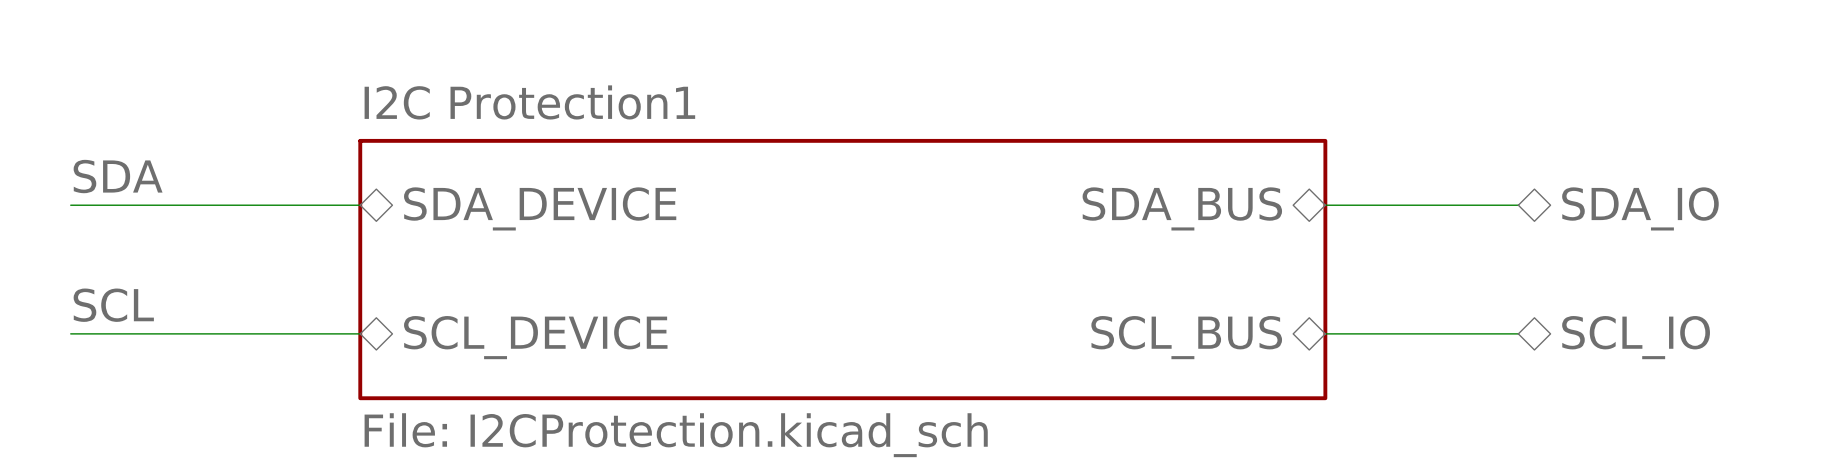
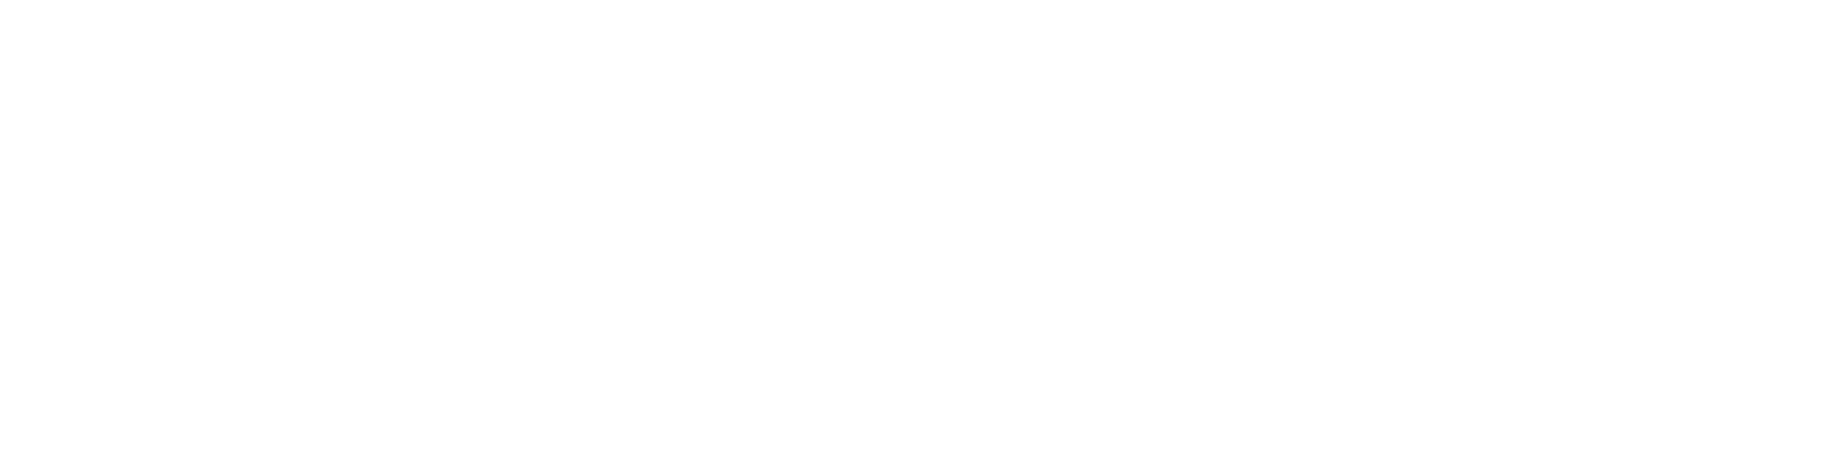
label: SDA (118, 176) -> none
wire: (70, 205) (360, 205) -> none
wire: (1325, 205) (1518, 205) -> none
sheet pin: SDA_DEVICE (540, 208) -> none
sheet pin: SDA_BUS (1182, 208) -> none
hierarchical label: SDA_IO (1640, 208) -> none
sheet I2C Protection1: File: I2CProtection.kicad_sch (842, 269) -> none
label: SCL (113, 305) -> none
wire: (70, 333) (360, 333) -> none
wire: (1325, 333) (1518, 333) -> none
sheet pin: SCL_DEVICE (535, 337) -> none
sheet pin: SCL_BUS (1186, 337) -> none
hierarchical label: SCL_IO (1636, 337) -> none

